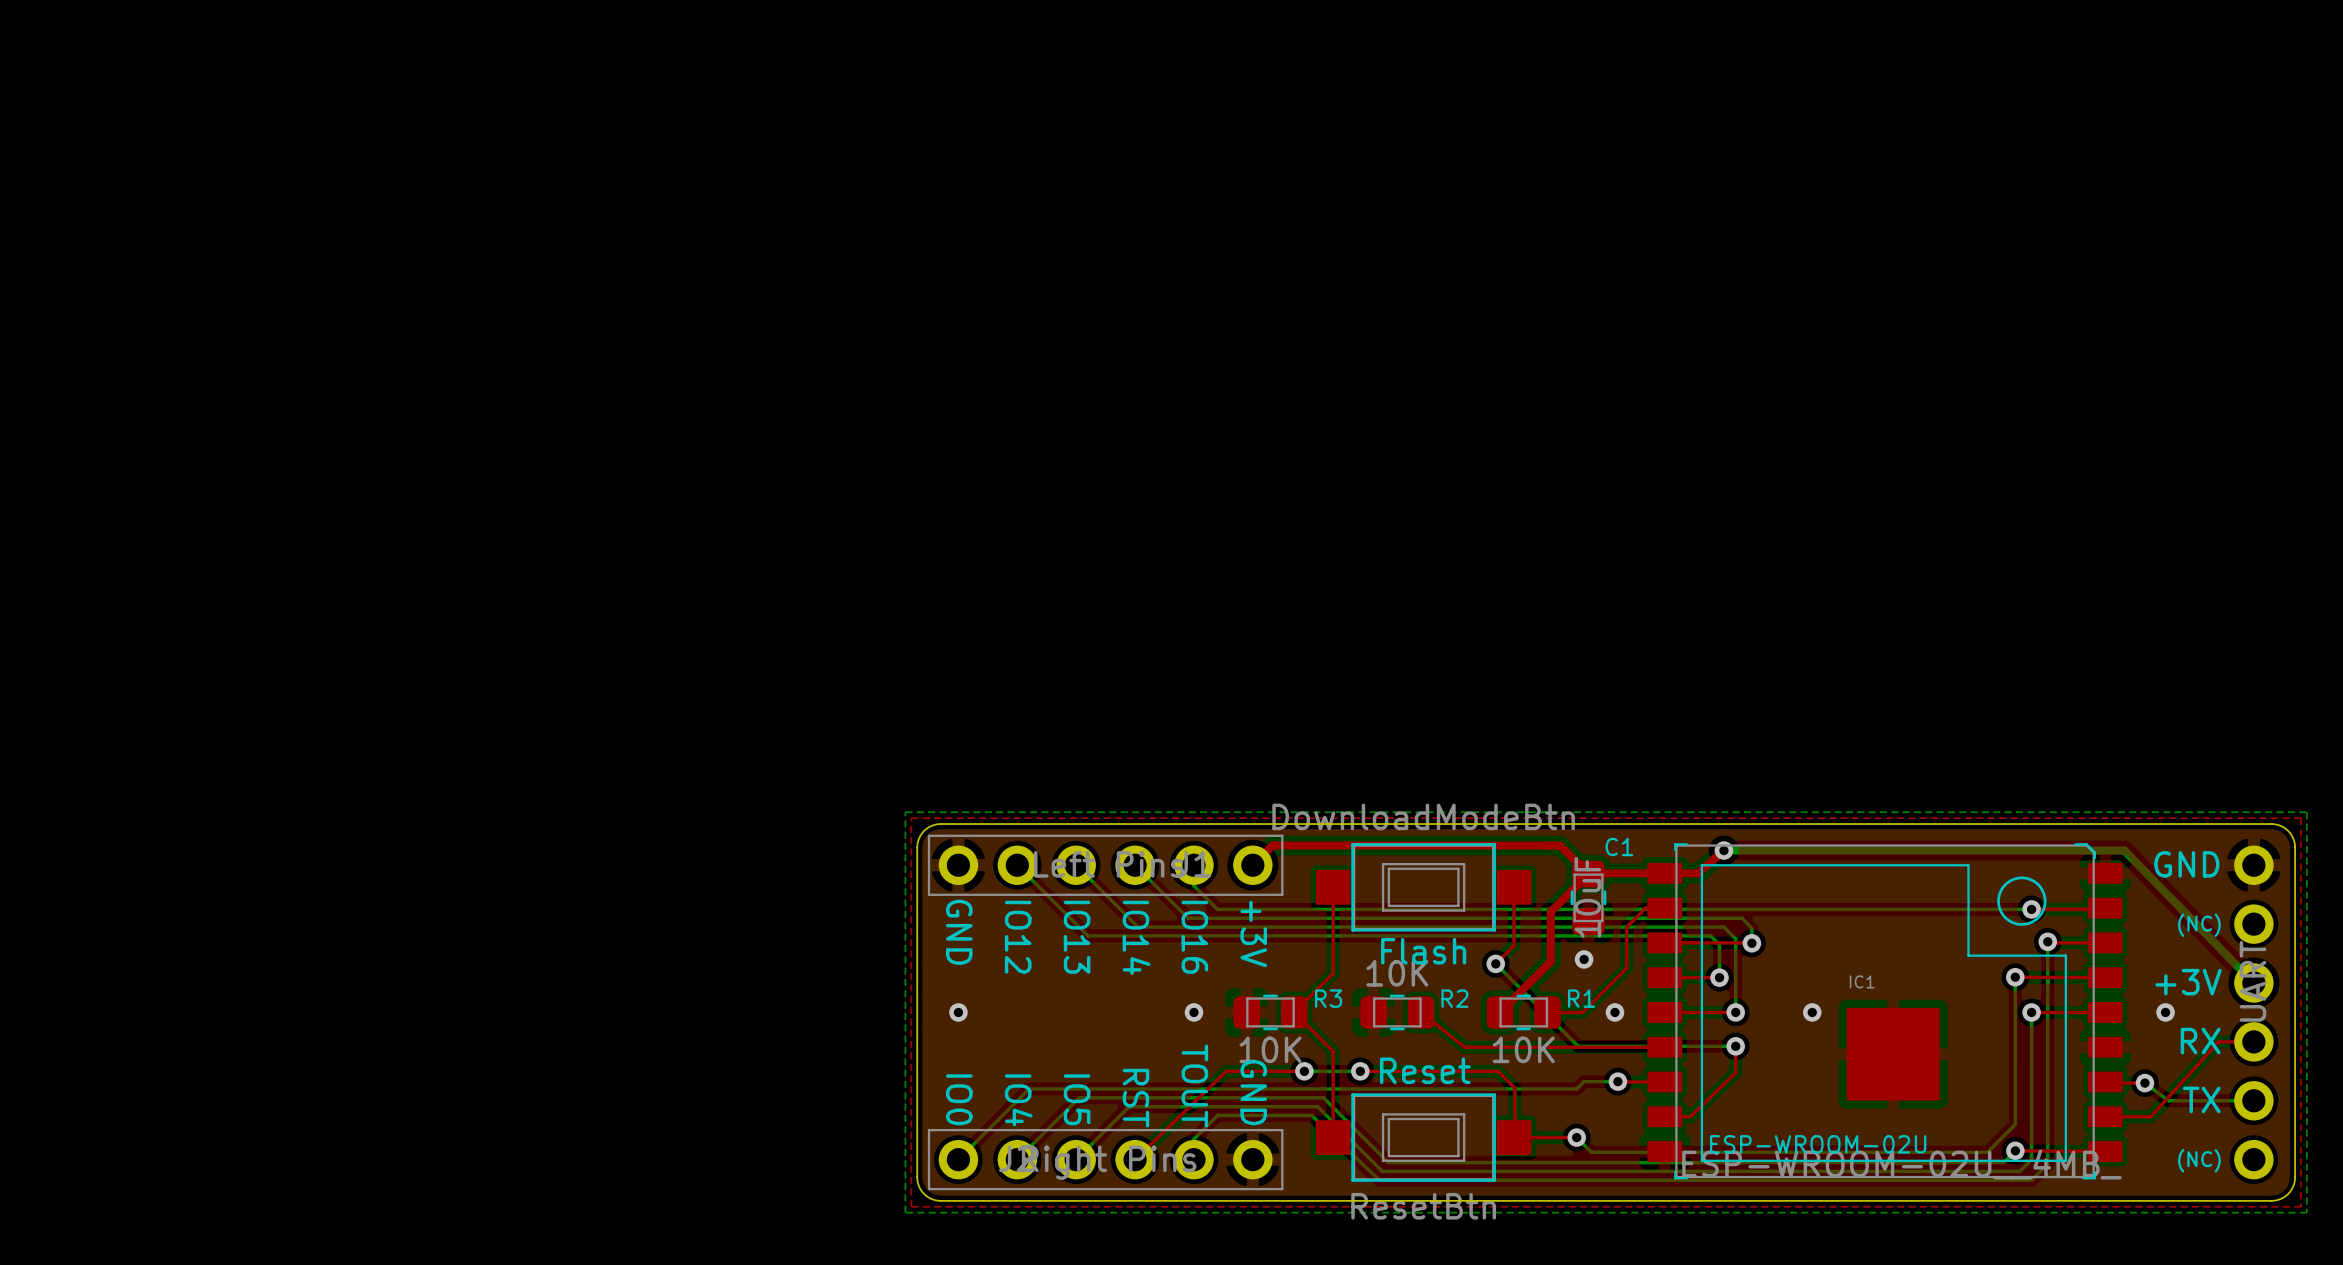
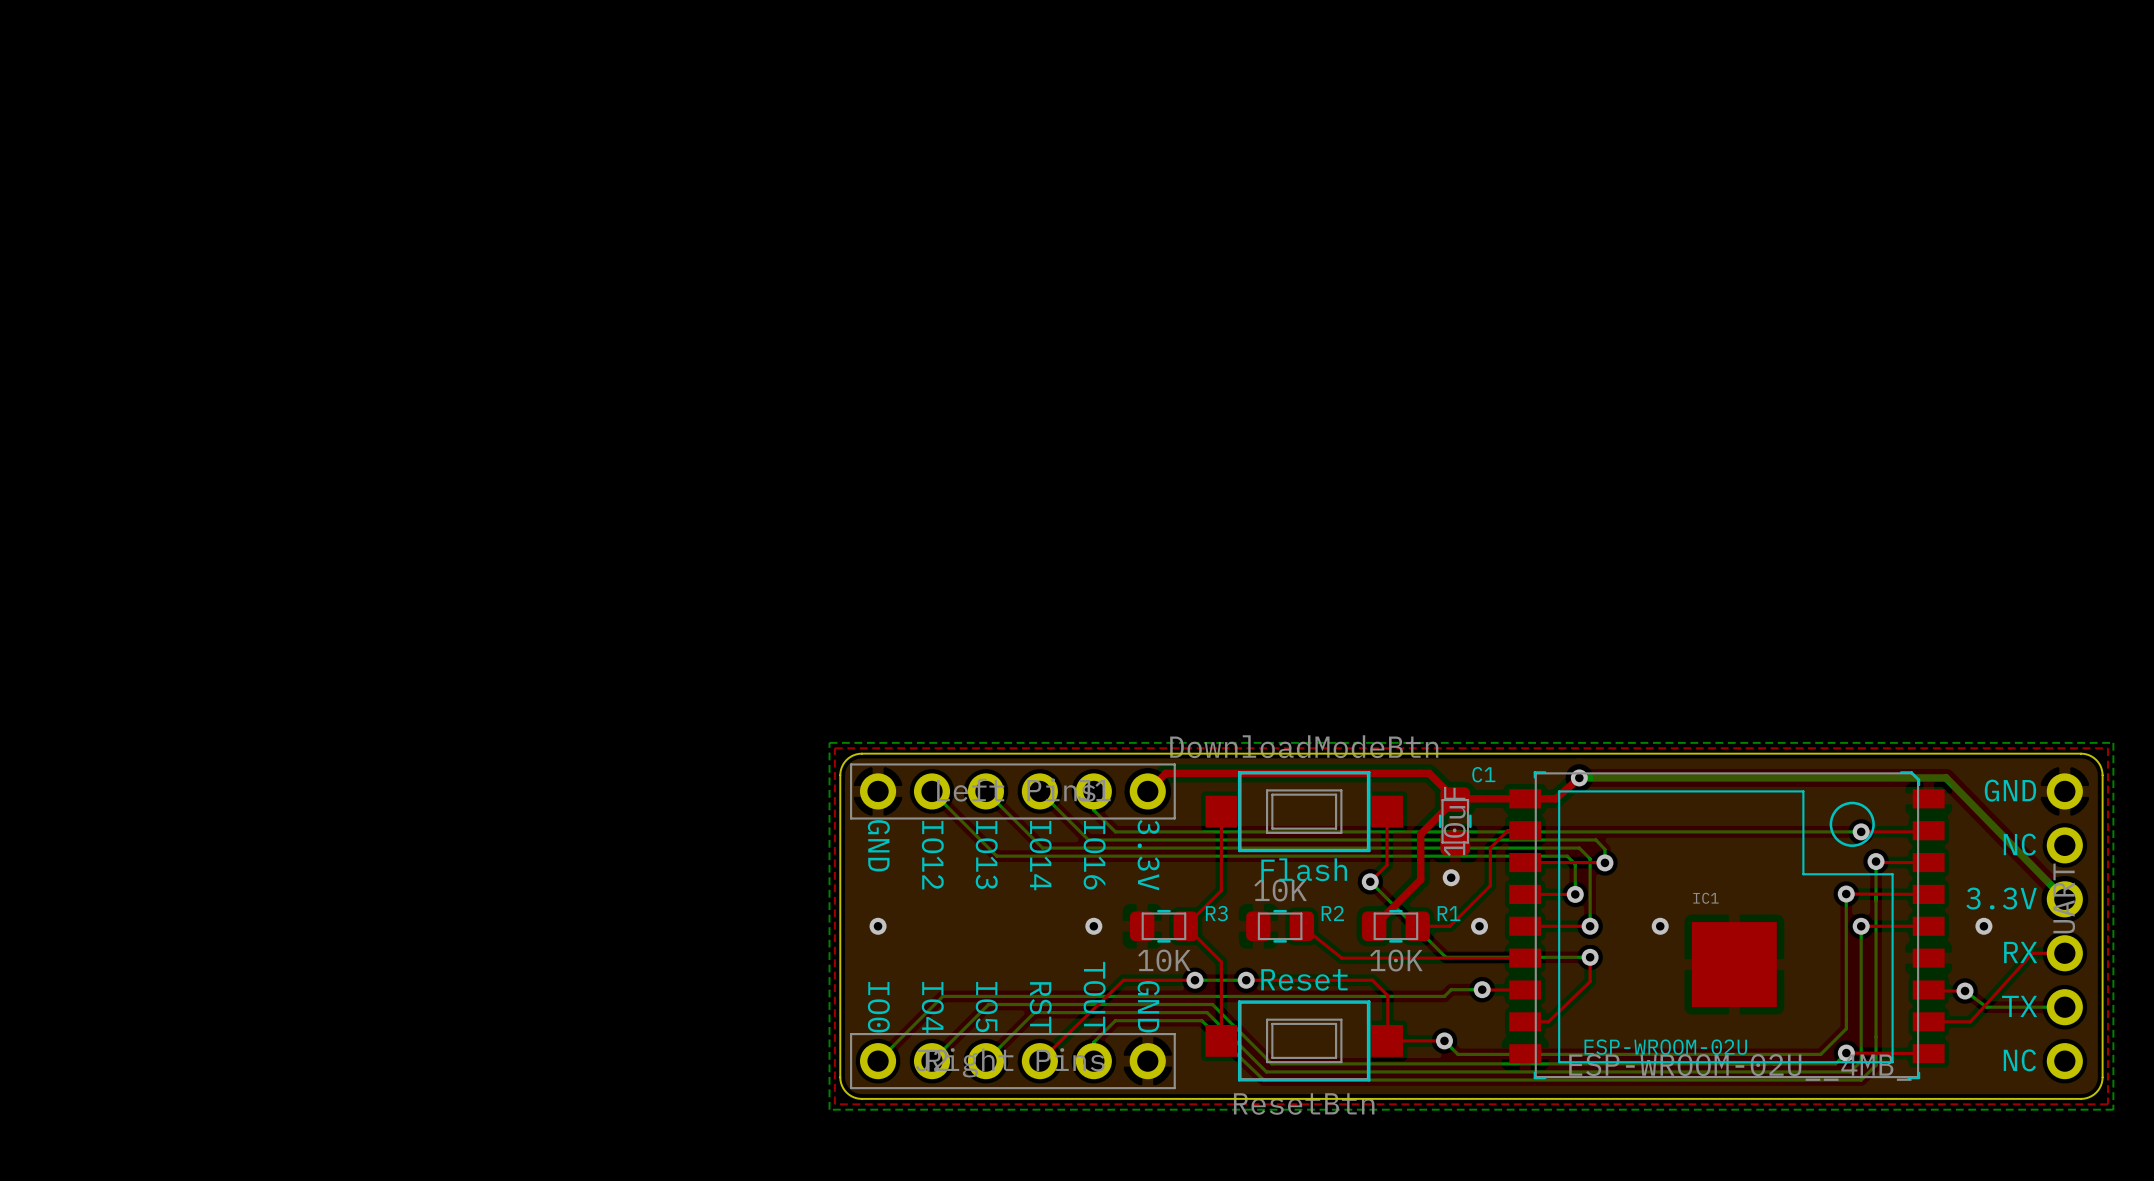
text: (NC) (2199, 925) -> NC (2019, 844)
text: +3V (1253, 933) -> 3.3V (1148, 855)
text: +3V (2188, 982) -> 3.3V (2001, 898)
text: (NC) (2199, 1160) -> NC (2019, 1060)

